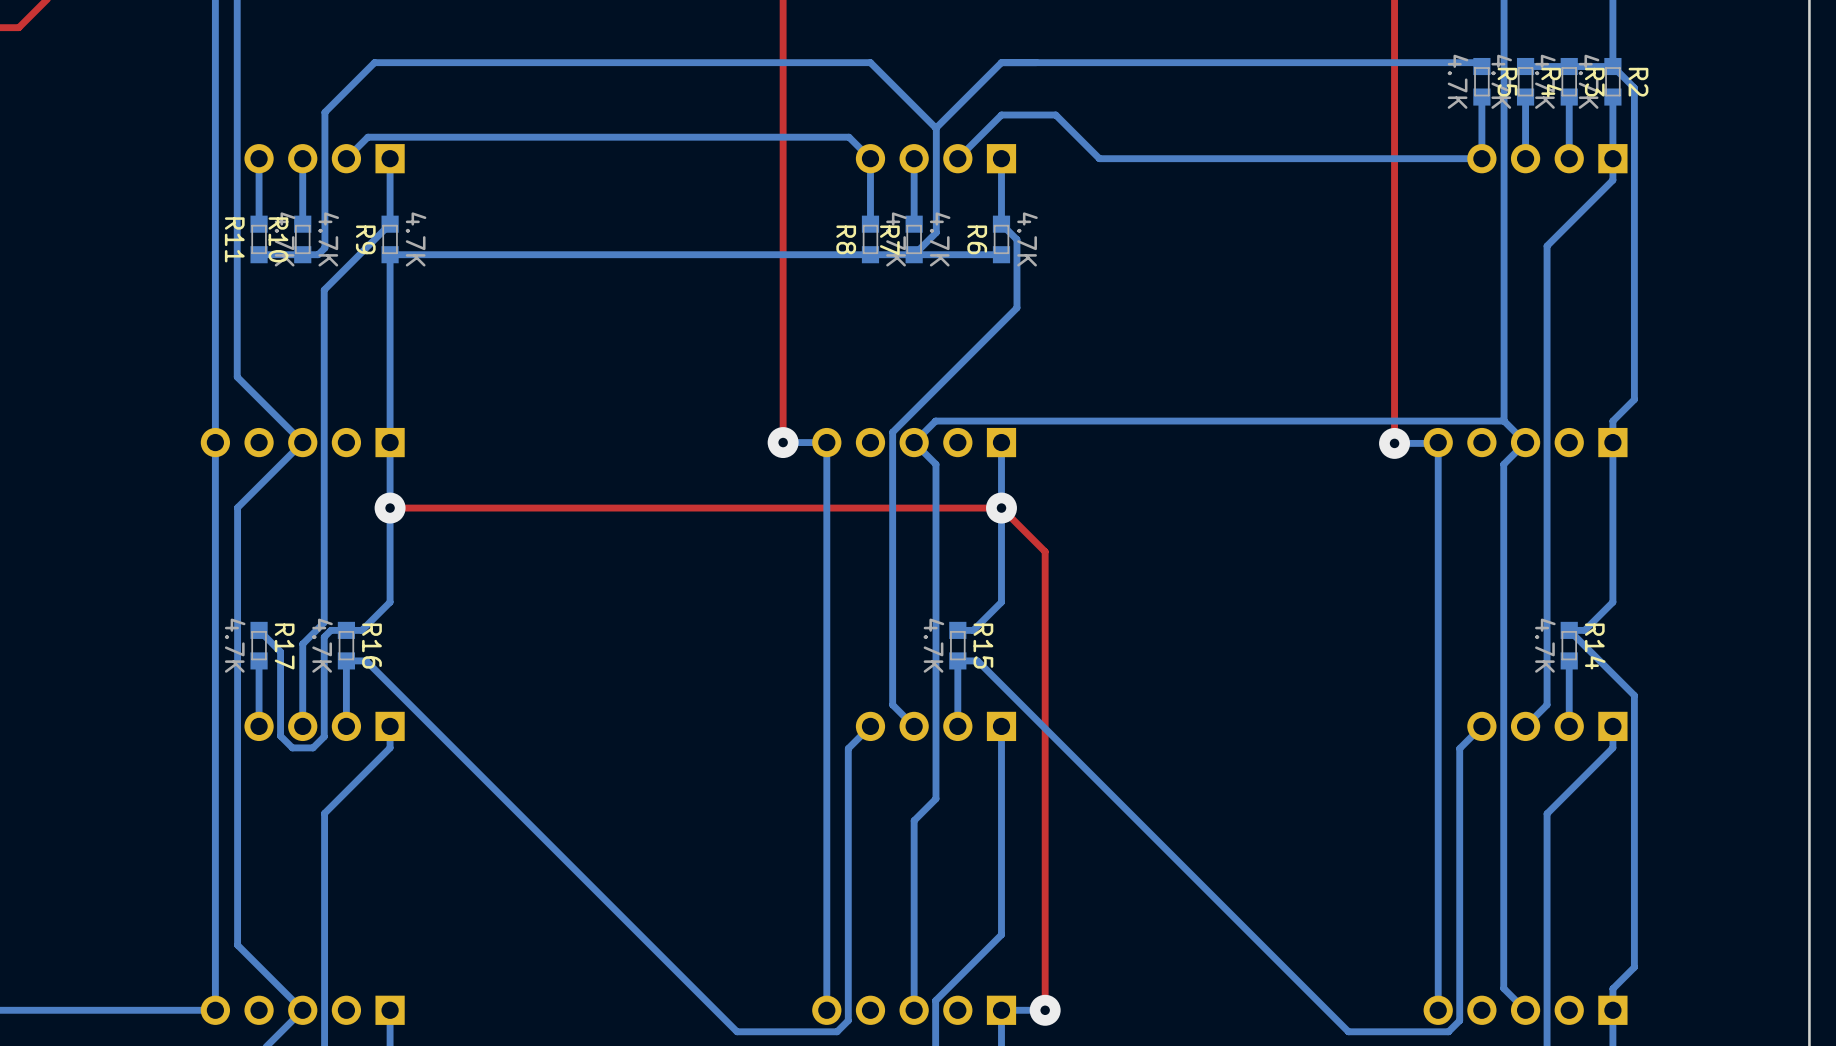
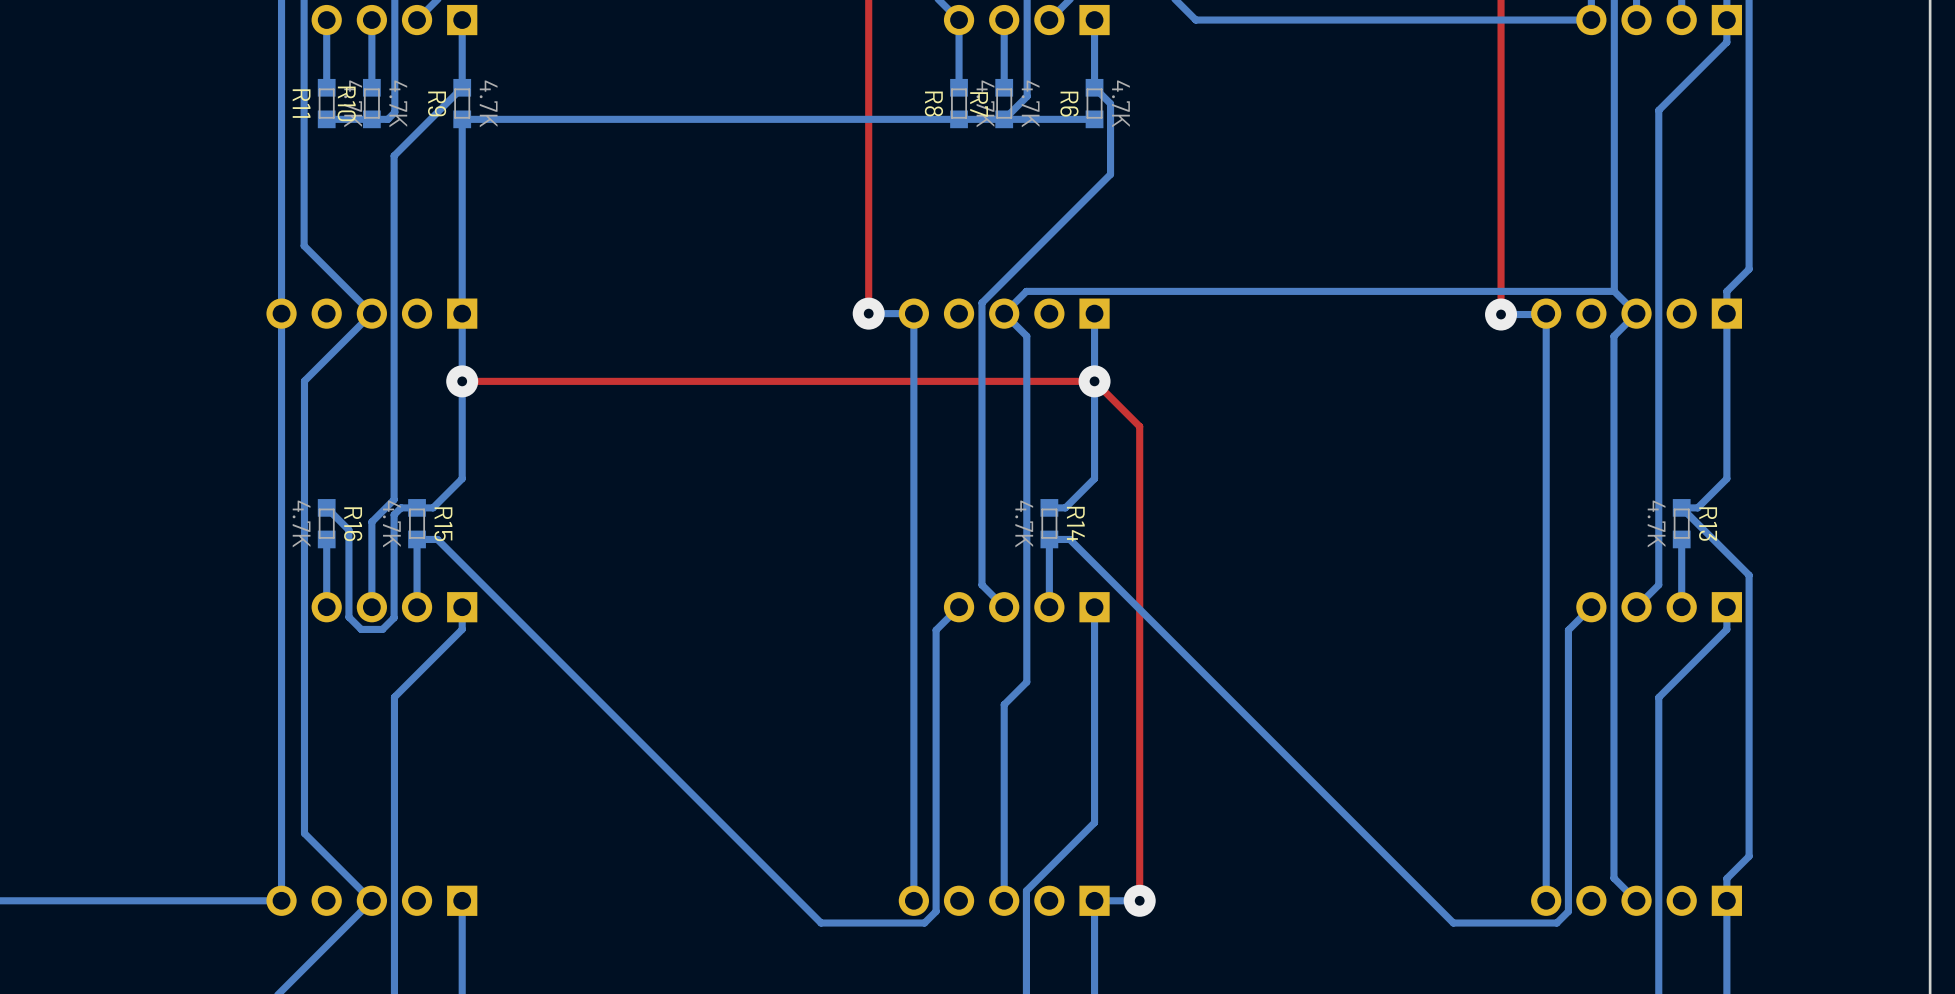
R17 name: R17 (284, 646) -> R16 (353, 524)
R16 name: R16 (371, 646) -> R15 (443, 524)
R15 name: R15 (983, 646) -> R14 (1075, 524)
R14 name: R14 (1595, 646) -> R13 (1708, 524)

